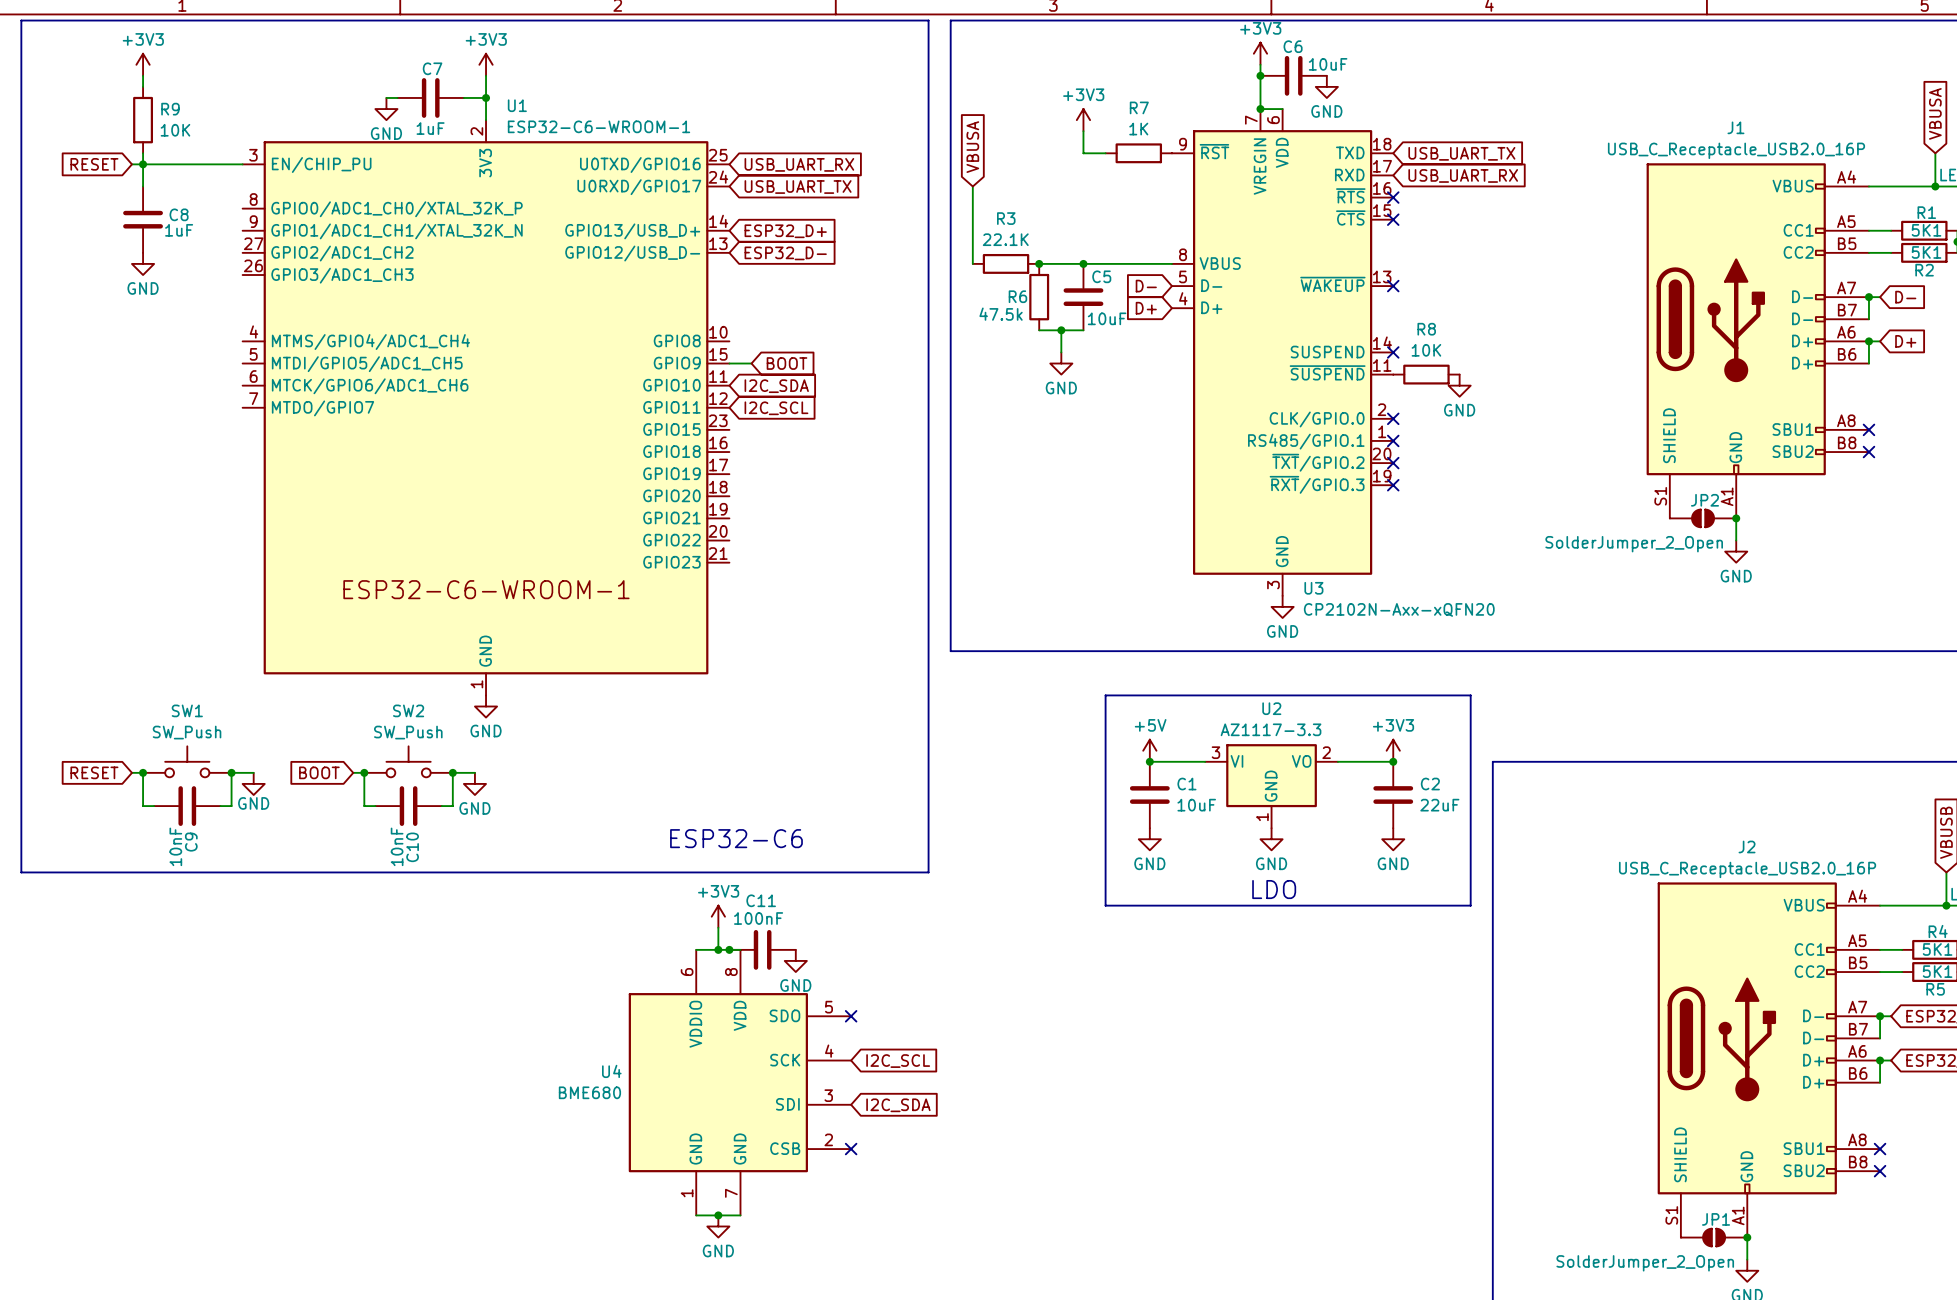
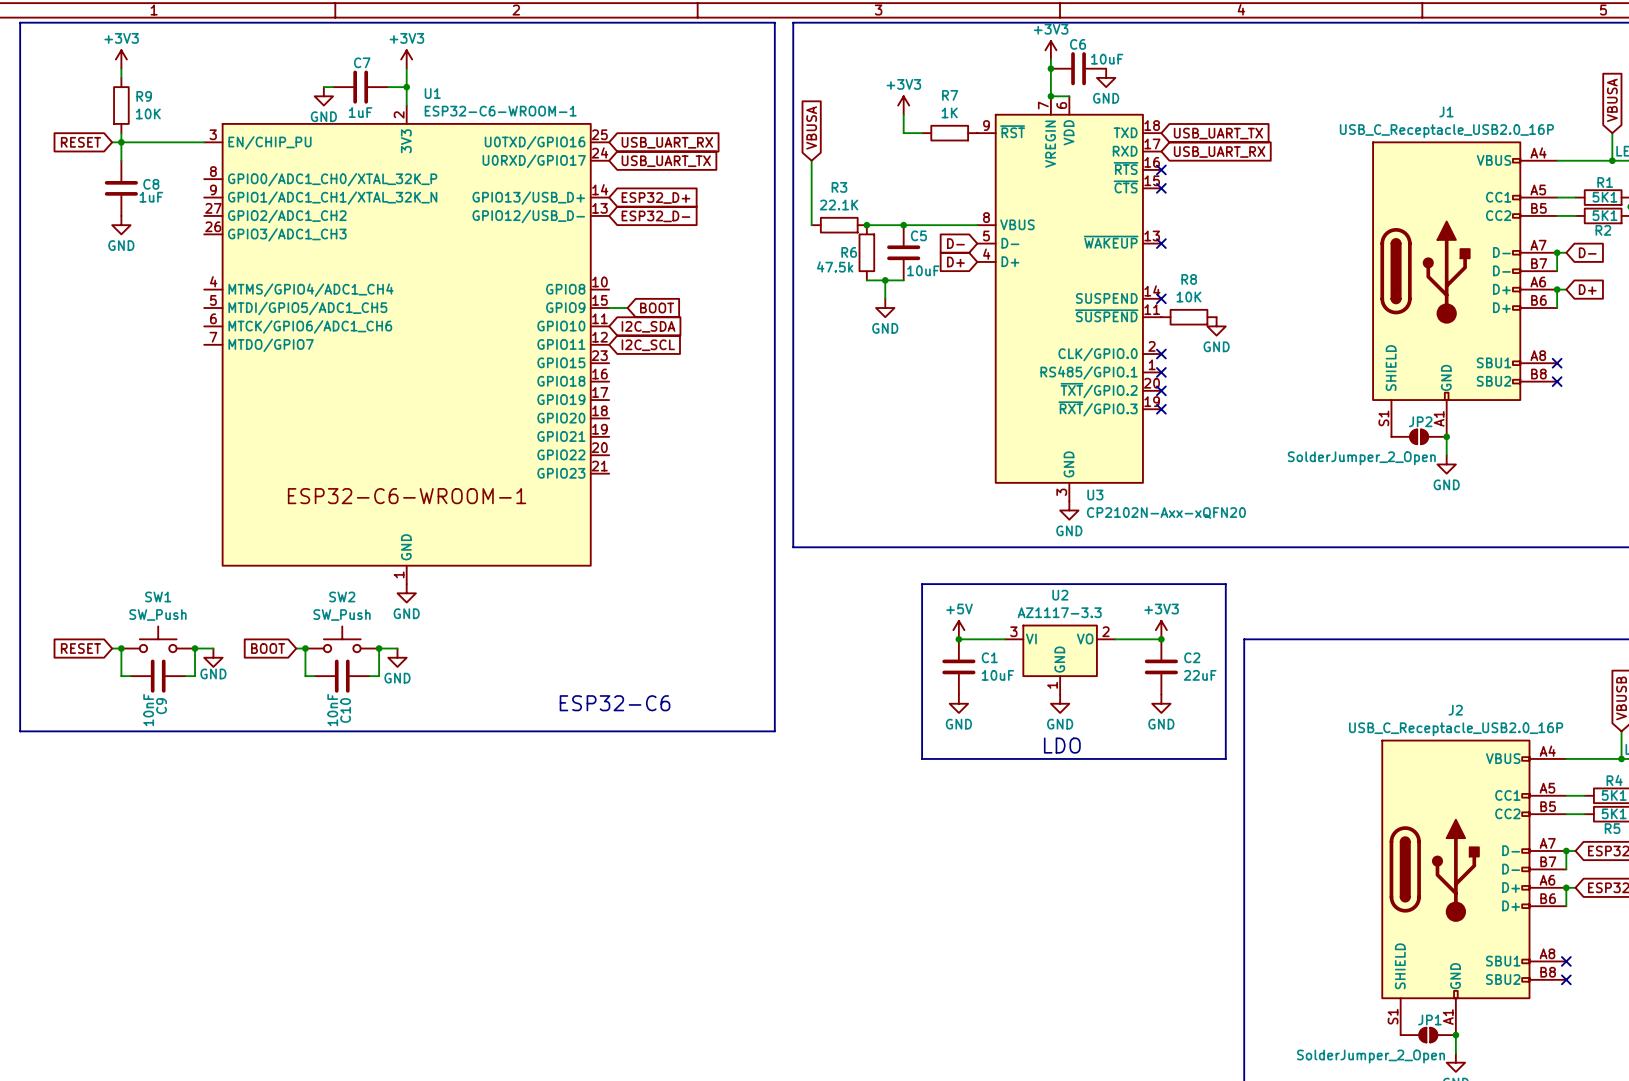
power symbol: +3V3 (718, 916) -> none
wire: (718, 927) (718, 949) -> none
wire: (696, 949) (740, 949) -> none
junction: (718, 949) -> none
junction: (729, 949) -> none
C11: 100nF (762, 949) -> none
power symbol: GND (795, 960) -> none
no-connect mark: (851, 1016) -> none
global label: I2C_SCL (898, 1061) -> none
U4: BME680 (739, 1082) -> none
global label: I2C_SDA (898, 1105) -> none
no-connect mark: (851, 1149) -> none
wire: (696, 1215) (740, 1215) -> none
junction: (718, 1215) -> none
power symbol: GND (718, 1226) -> none

